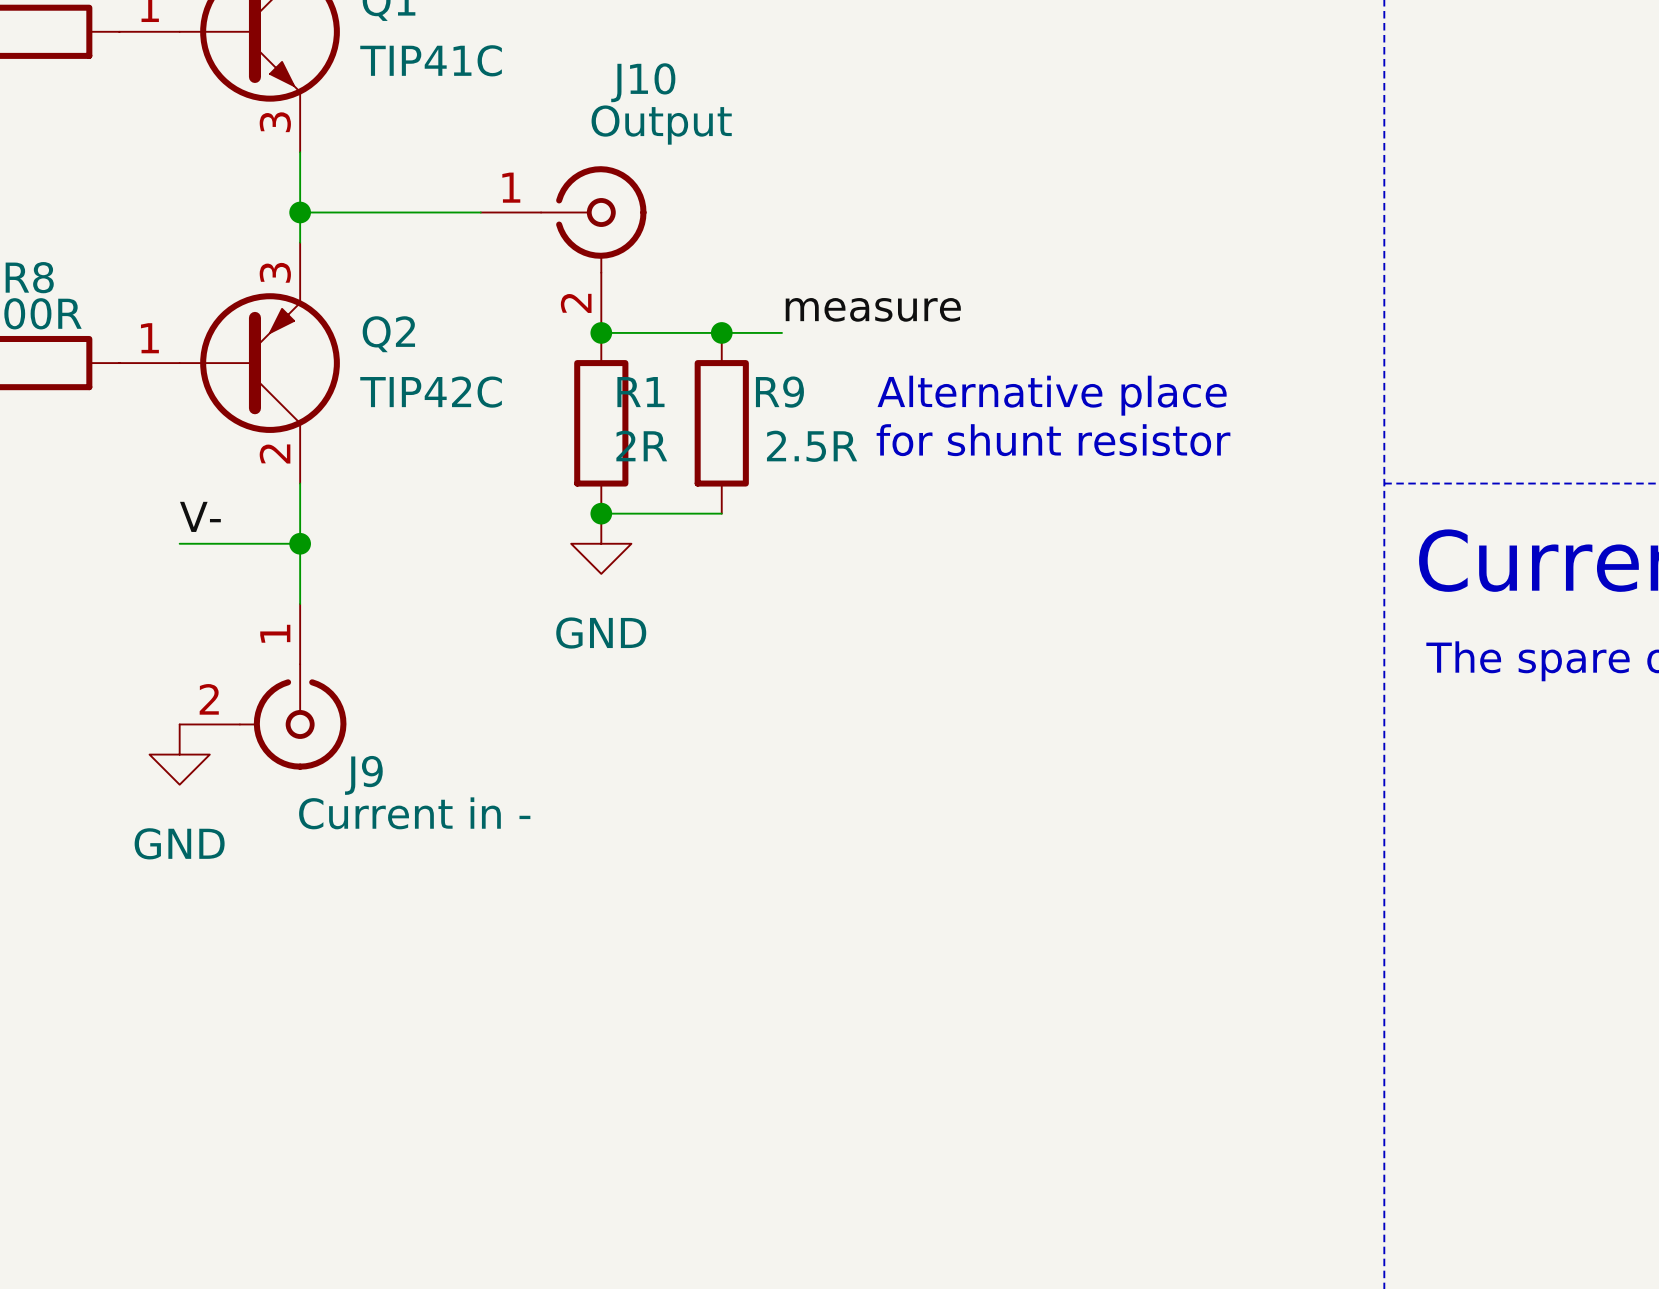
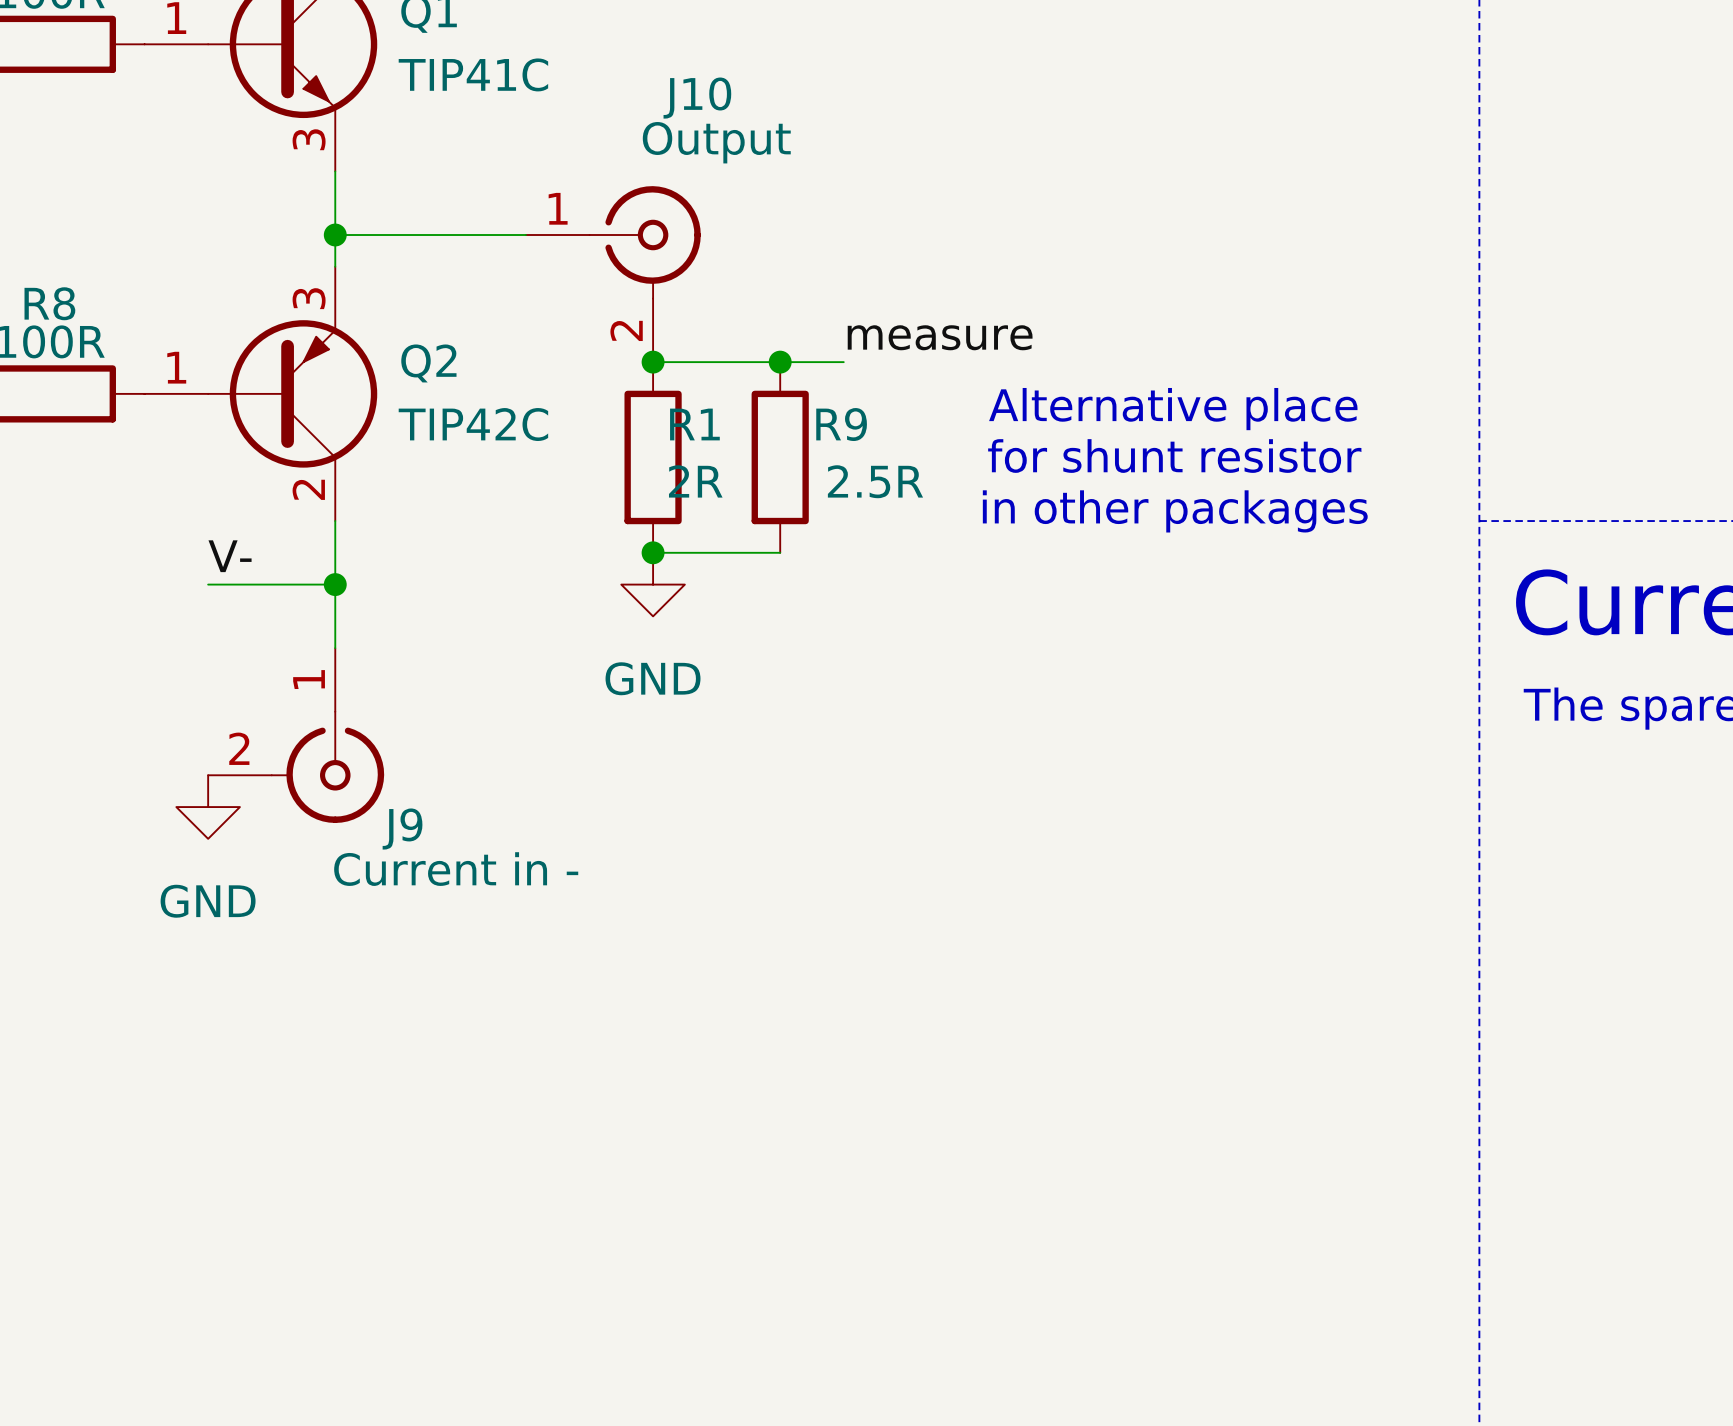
text position: Alternative place (1052, 395) -> Alternative place (1173, 409)
text position: for shunt resistor (1053, 440) -> for shunt resistor (1174, 456)
text: none -> in other packages (1175, 511)

